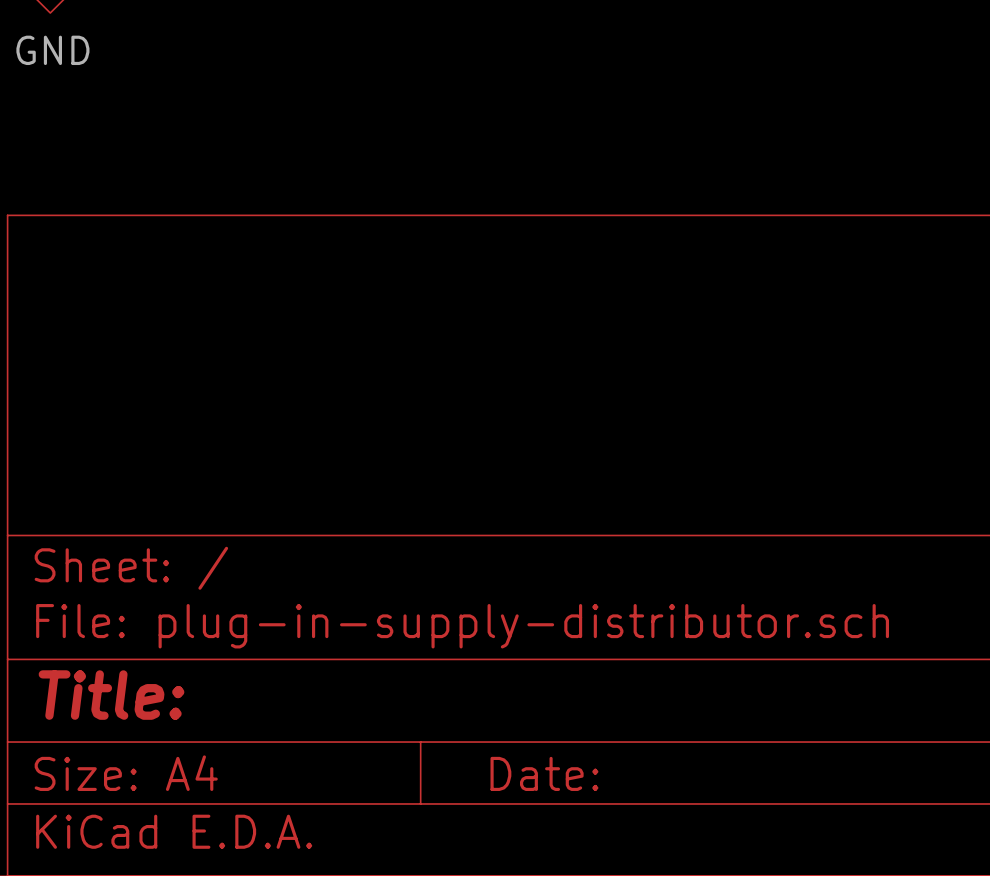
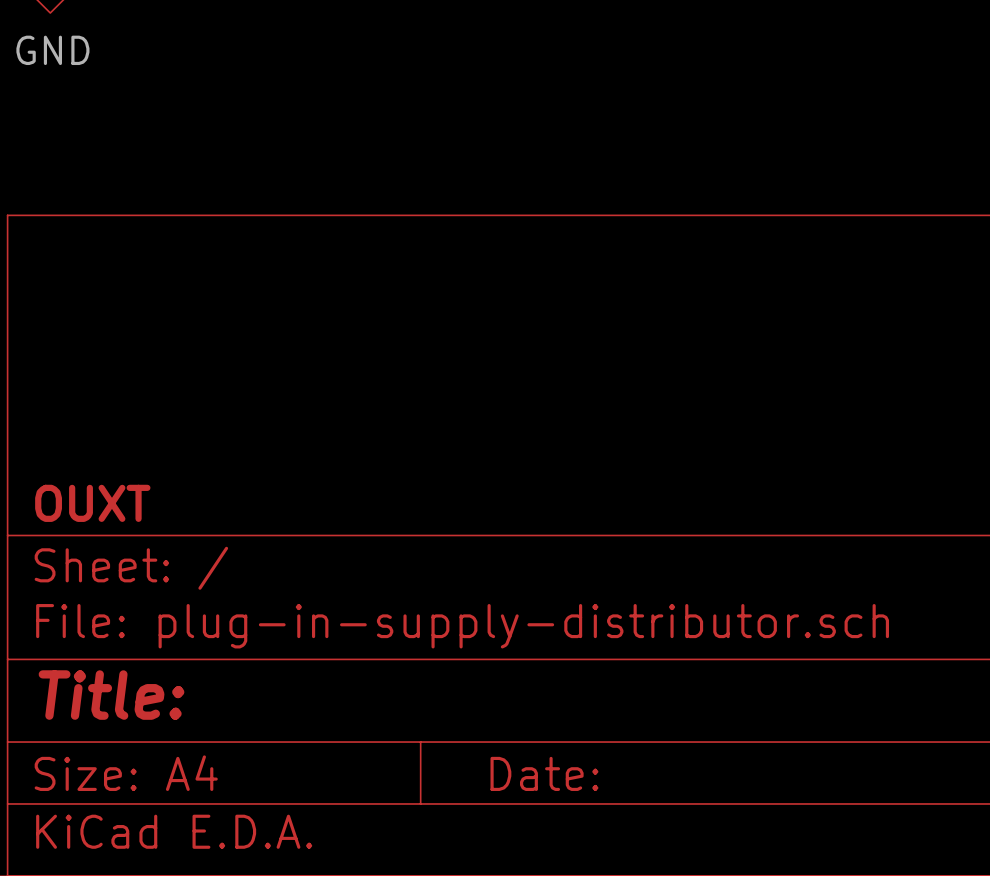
title block: none -> OUXT (92, 503)

